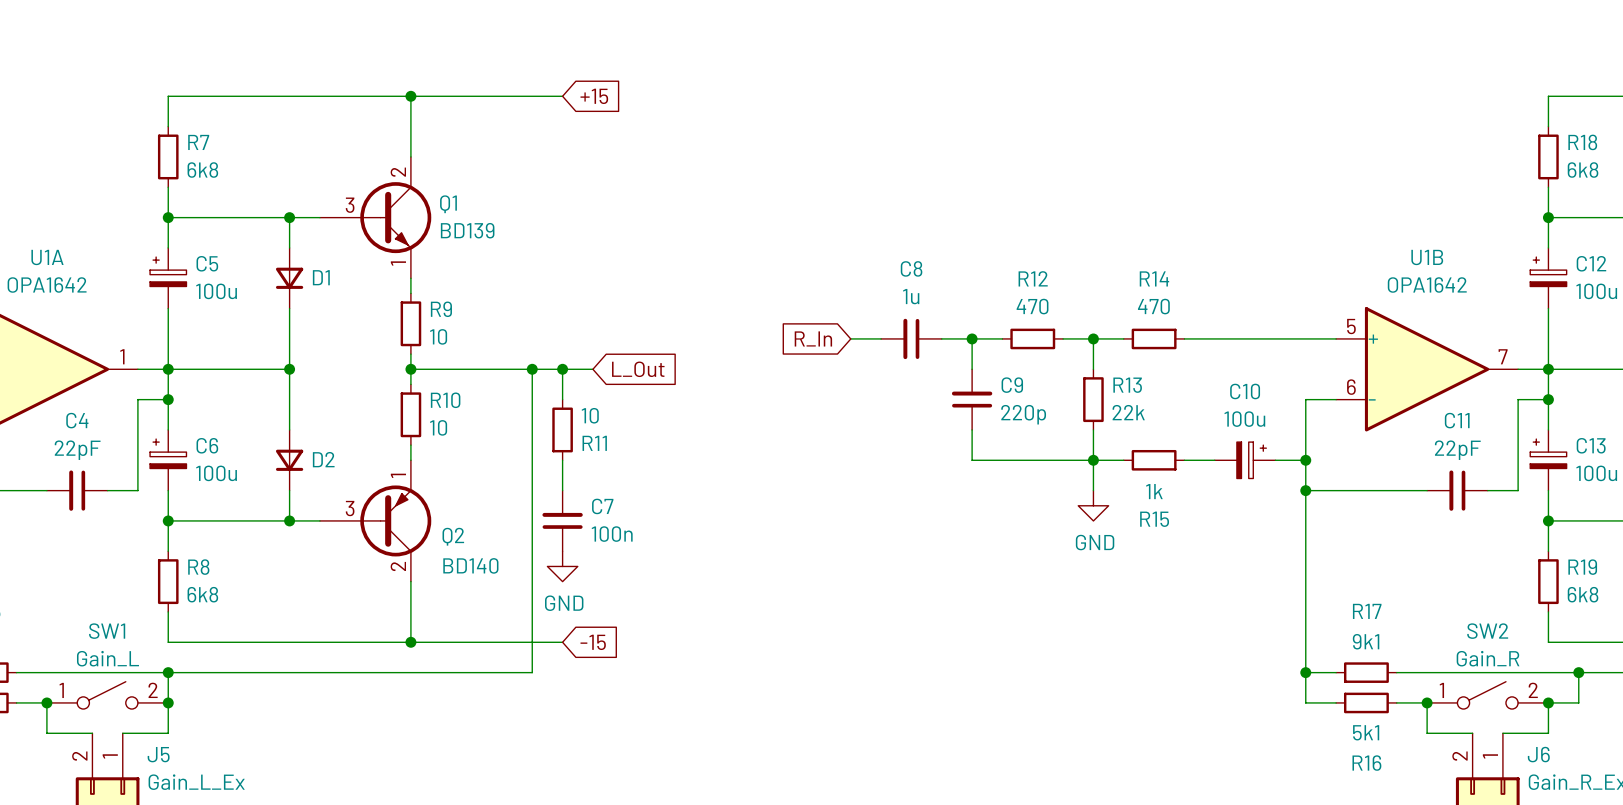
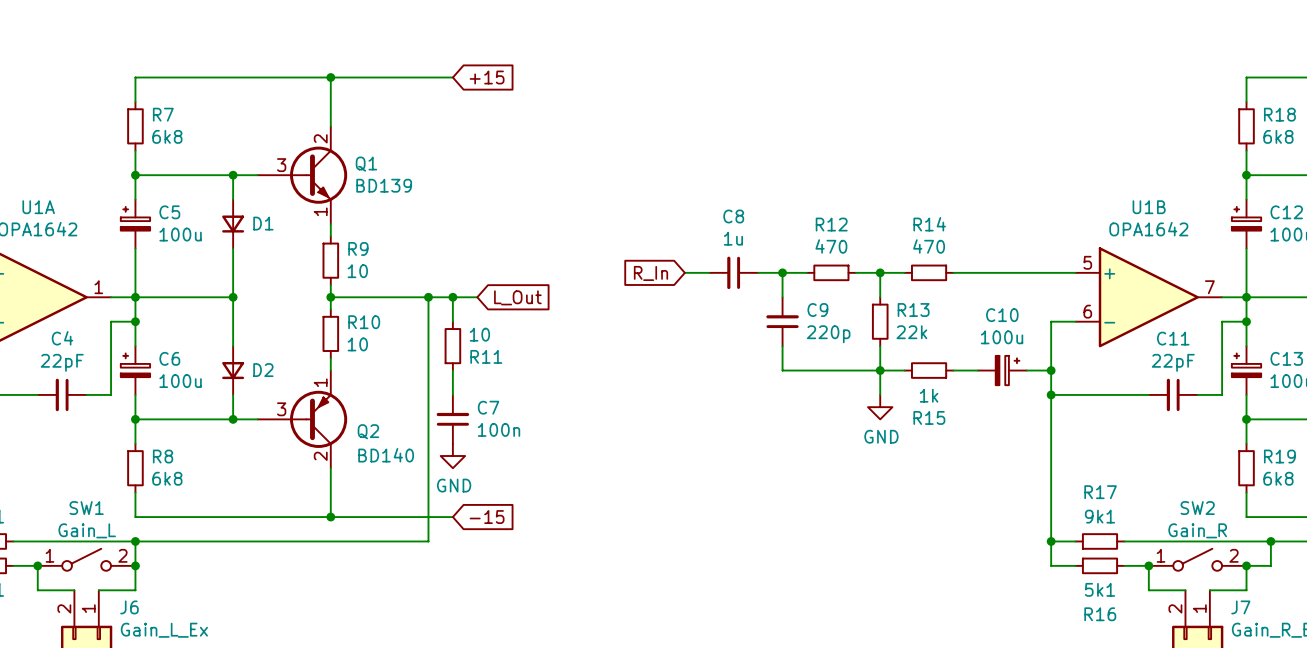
J5 name: J5 (158, 754) -> J6 (129, 607)
J6 name: J6 (1538, 754) -> J7 (1240, 607)

